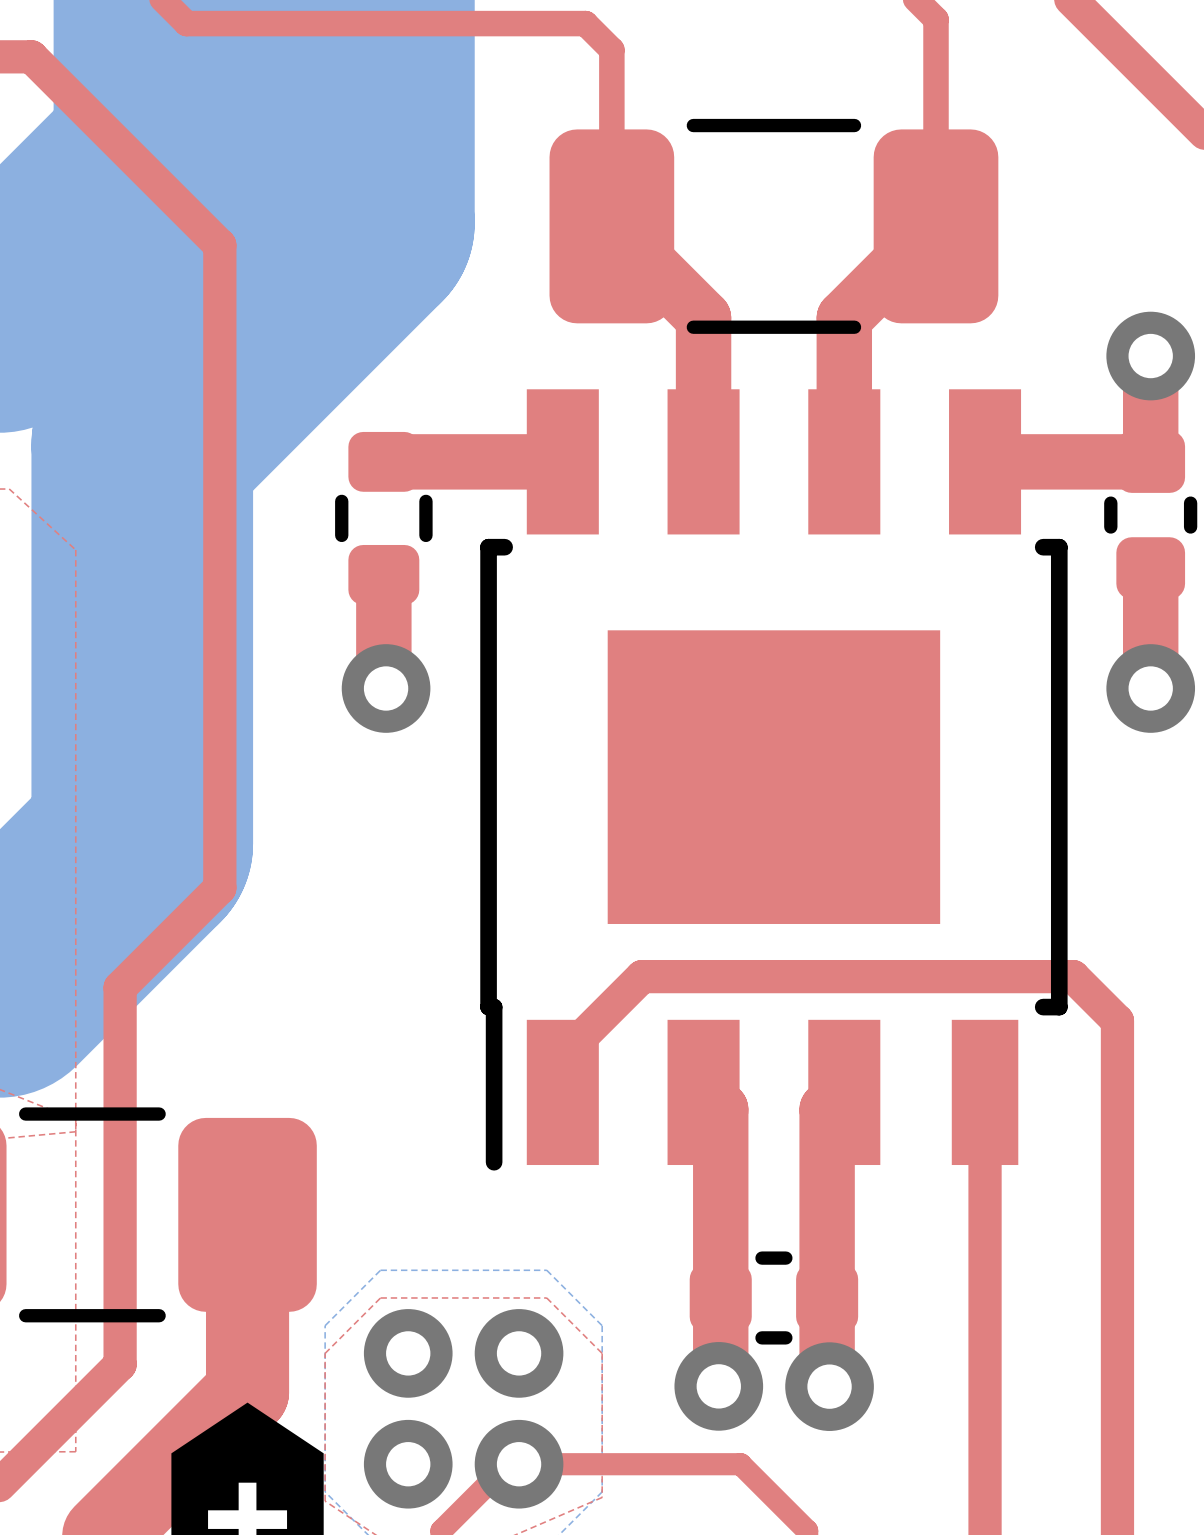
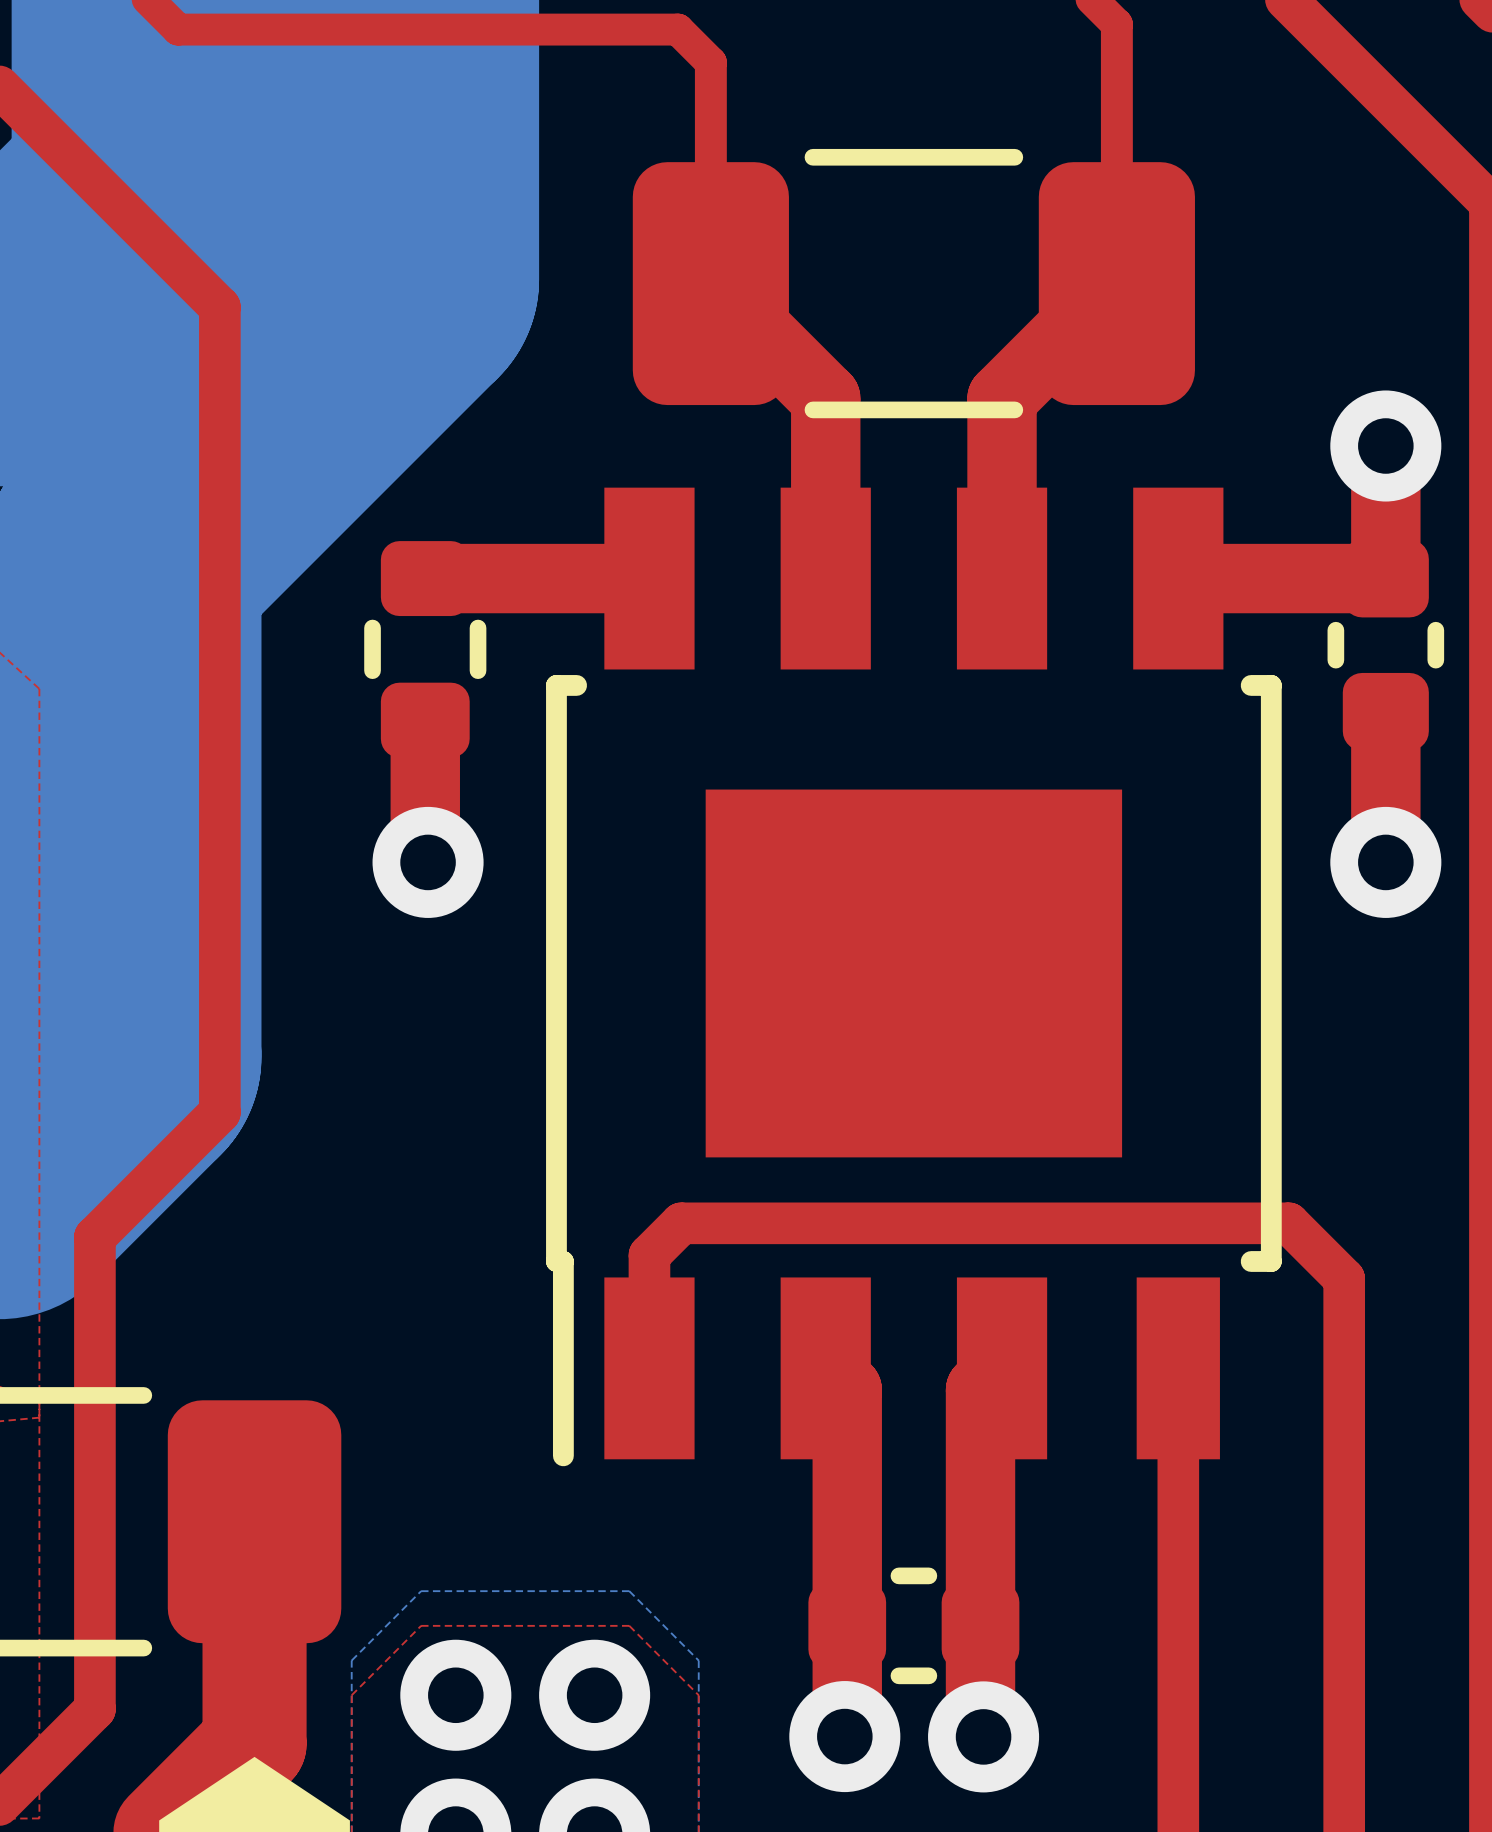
top track: (642, 976) (562, 1055) -> (748, 1223) (681, 1223) (649, 1255) (649, 1322)

